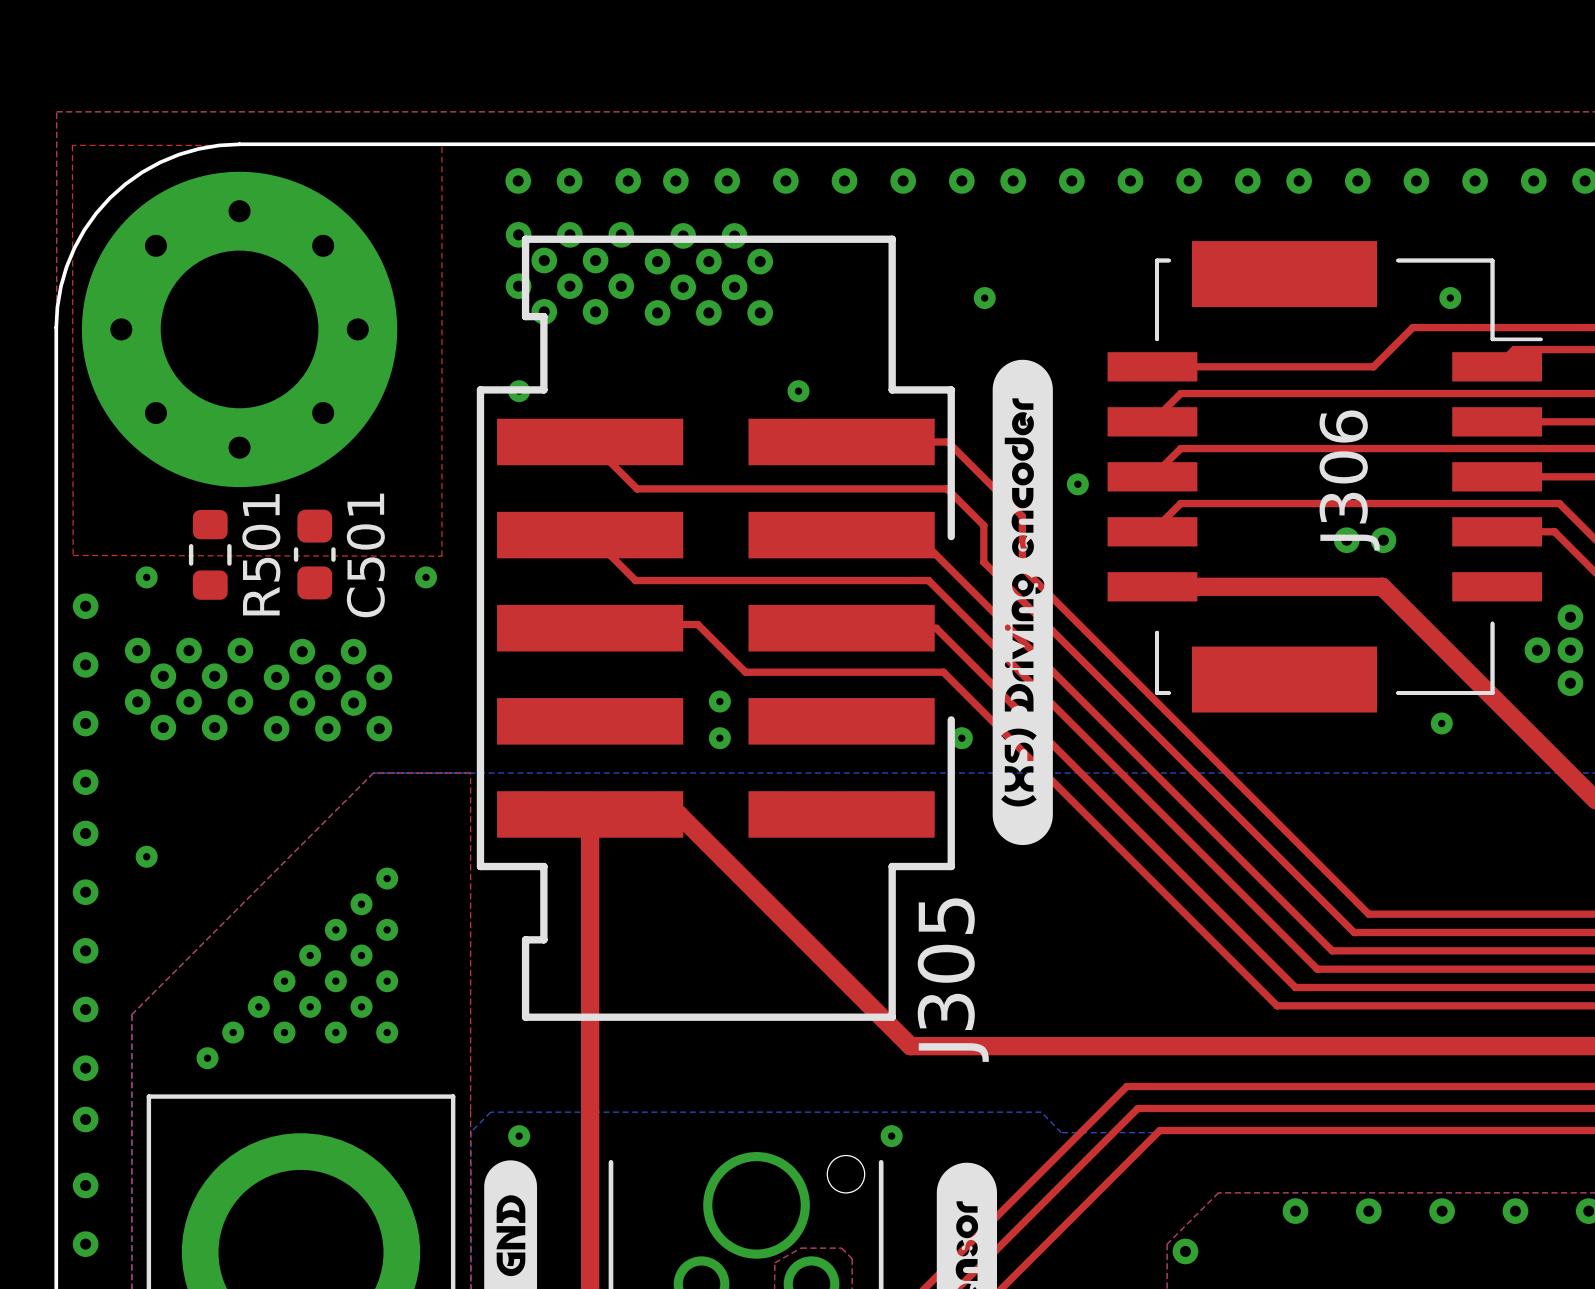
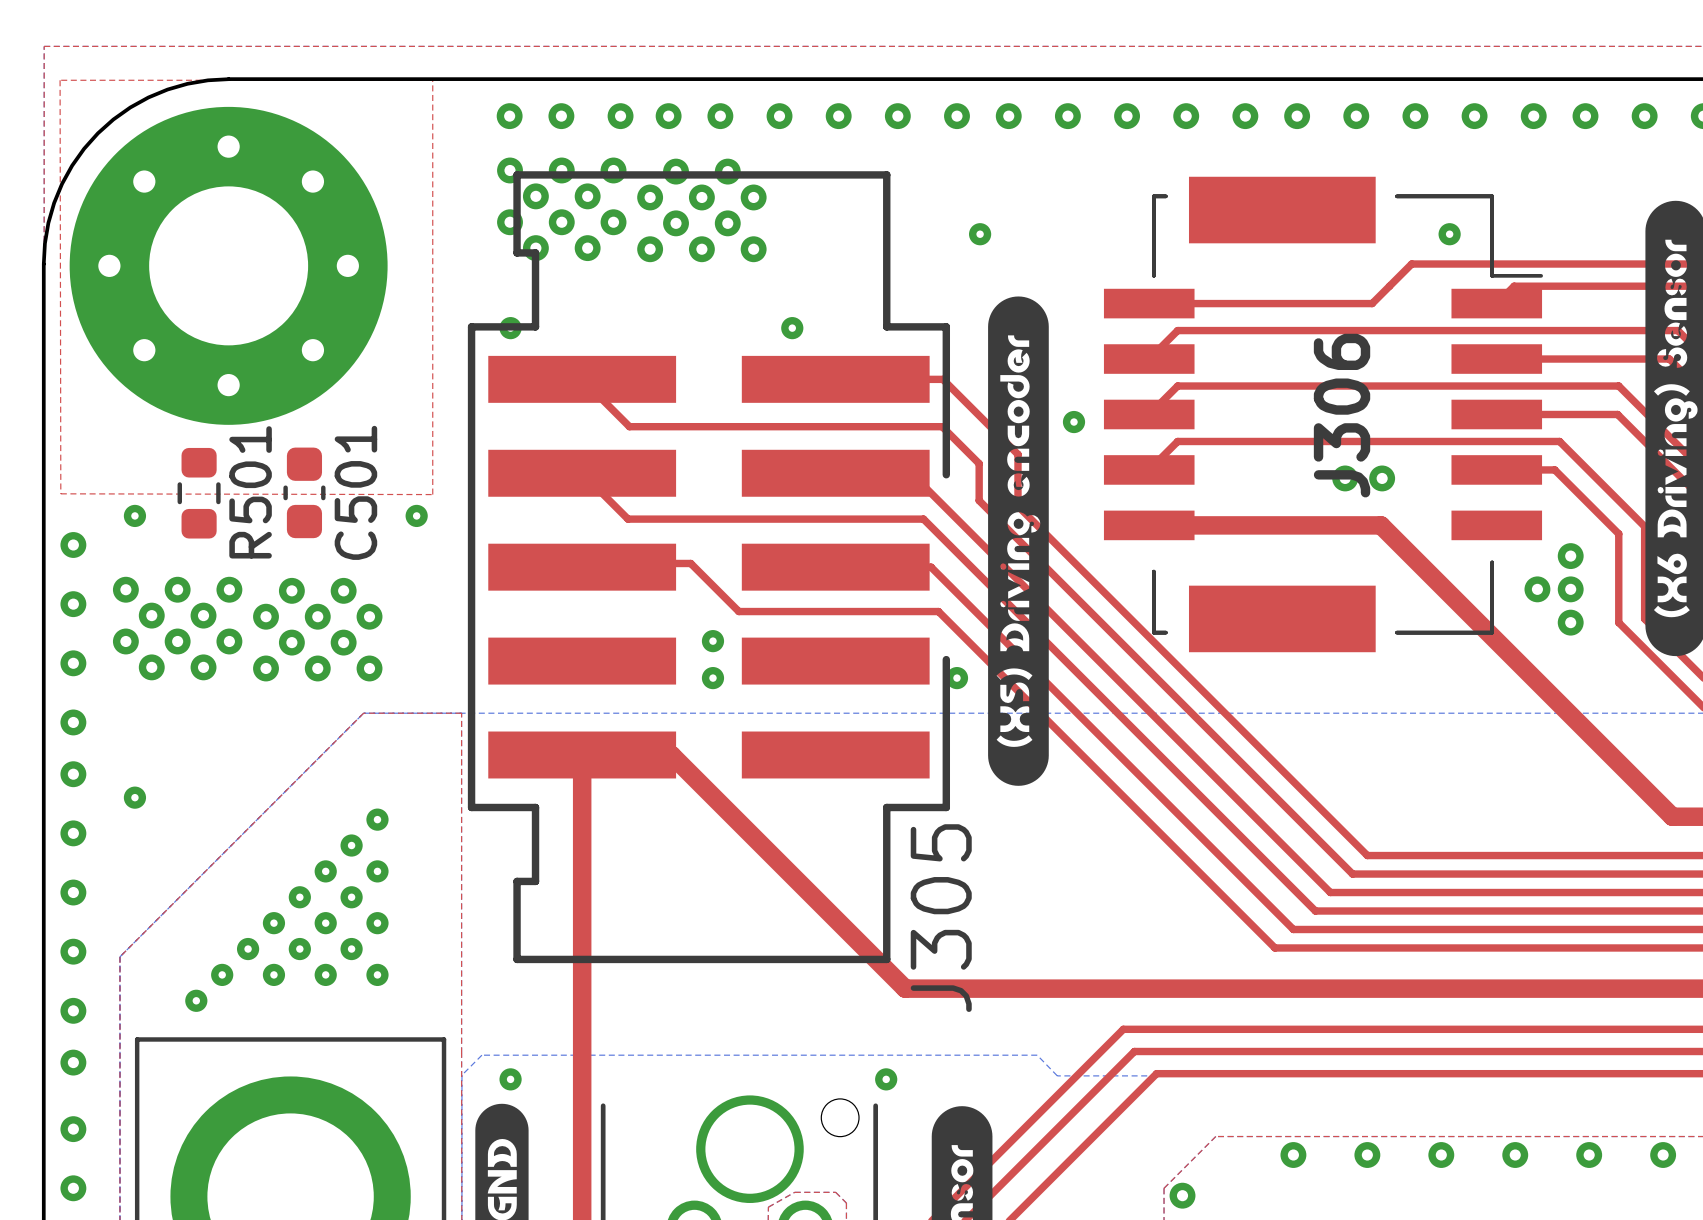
via: (1441, 723) -> none

